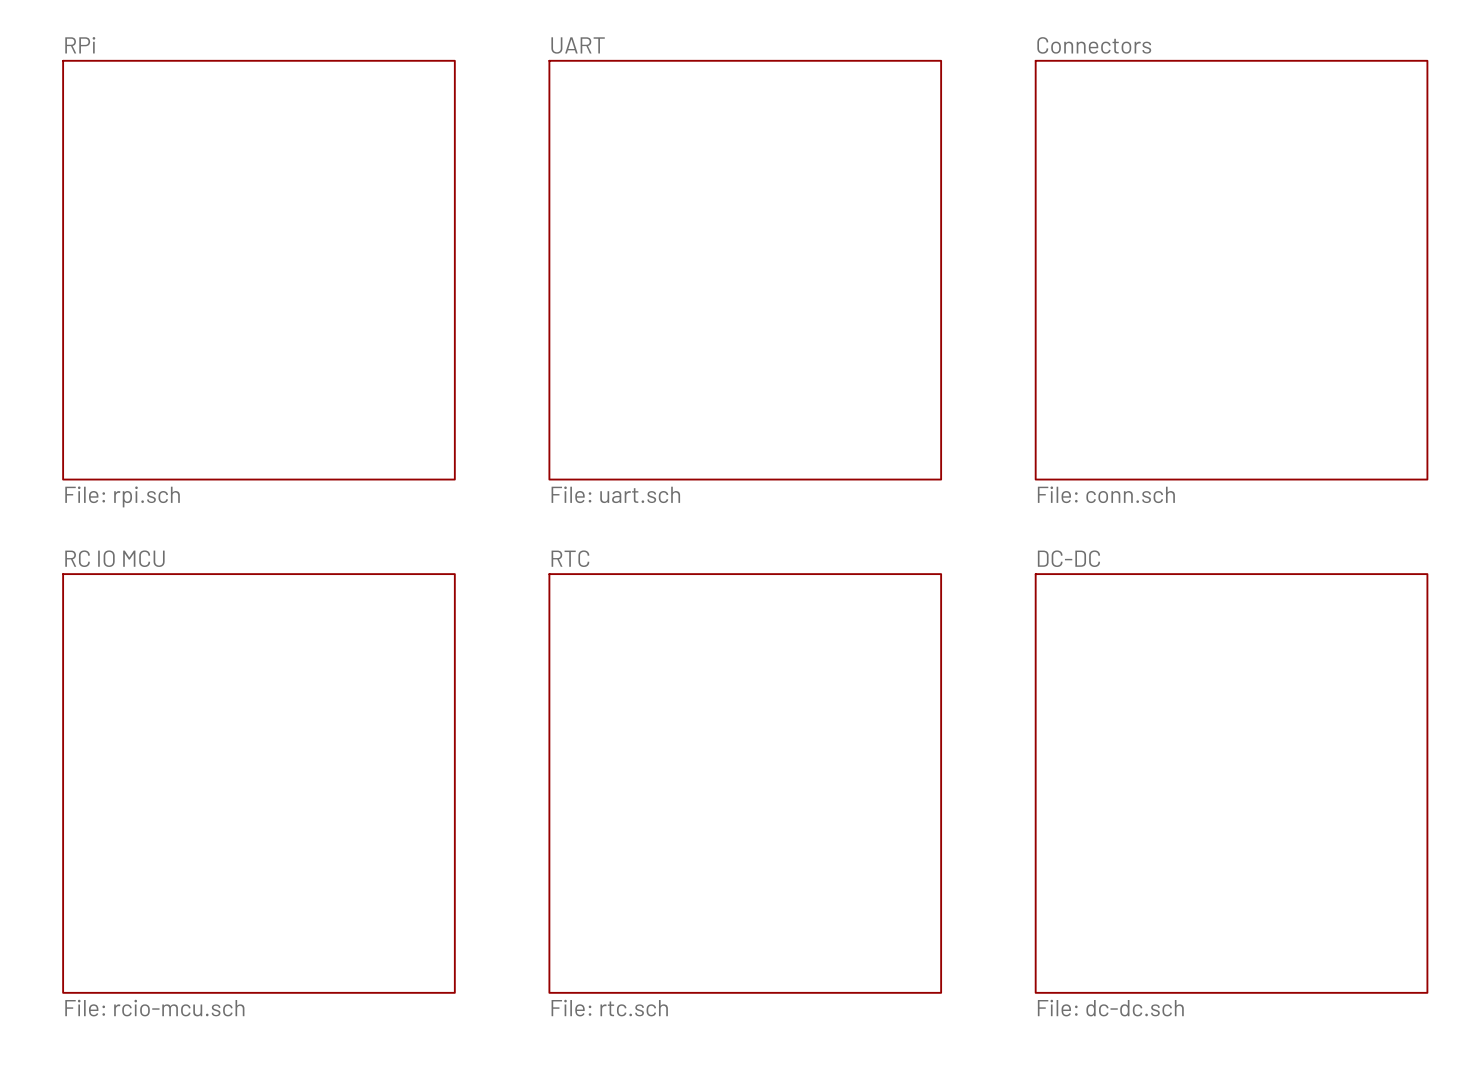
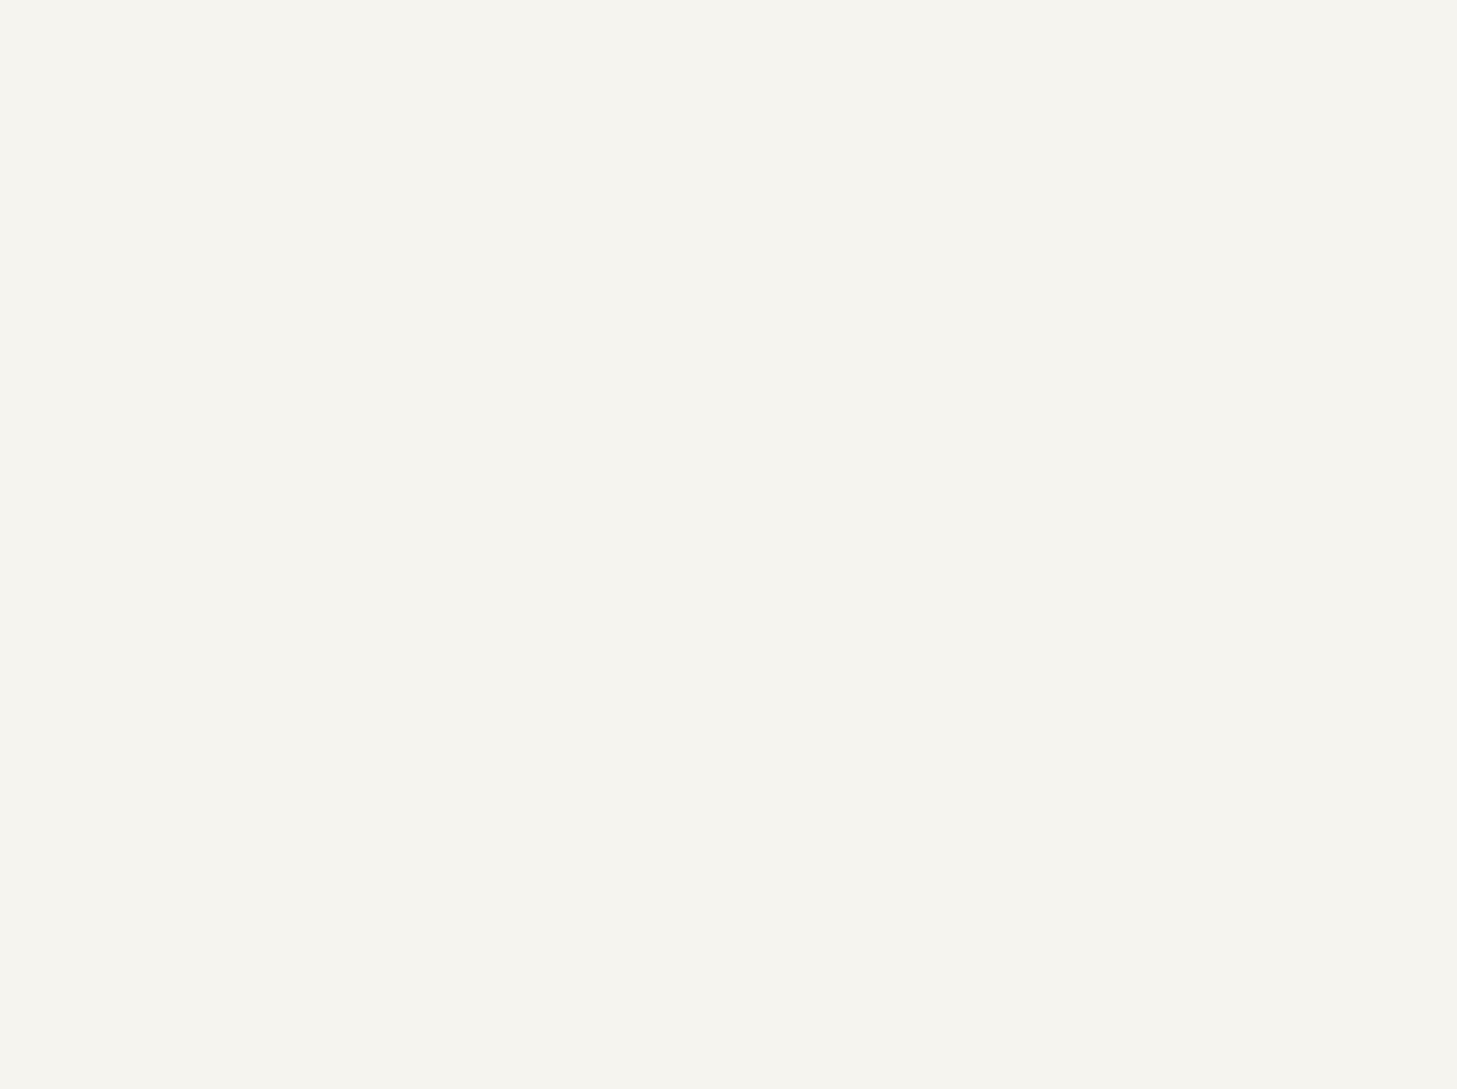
sheet RPi: File: rpi.sch (258, 270) -> none
sheet UART: File: uart.sch (745, 270) -> none
sheet Connectors: File: conn.sch (1231, 270) -> none
sheet RC IO MCU: File: rcio-mcu.sch (258, 783) -> none
sheet RTC: File: rtc.sch (745, 783) -> none
sheet DC-DC: File: dc-dc.sch (1231, 783) -> none

